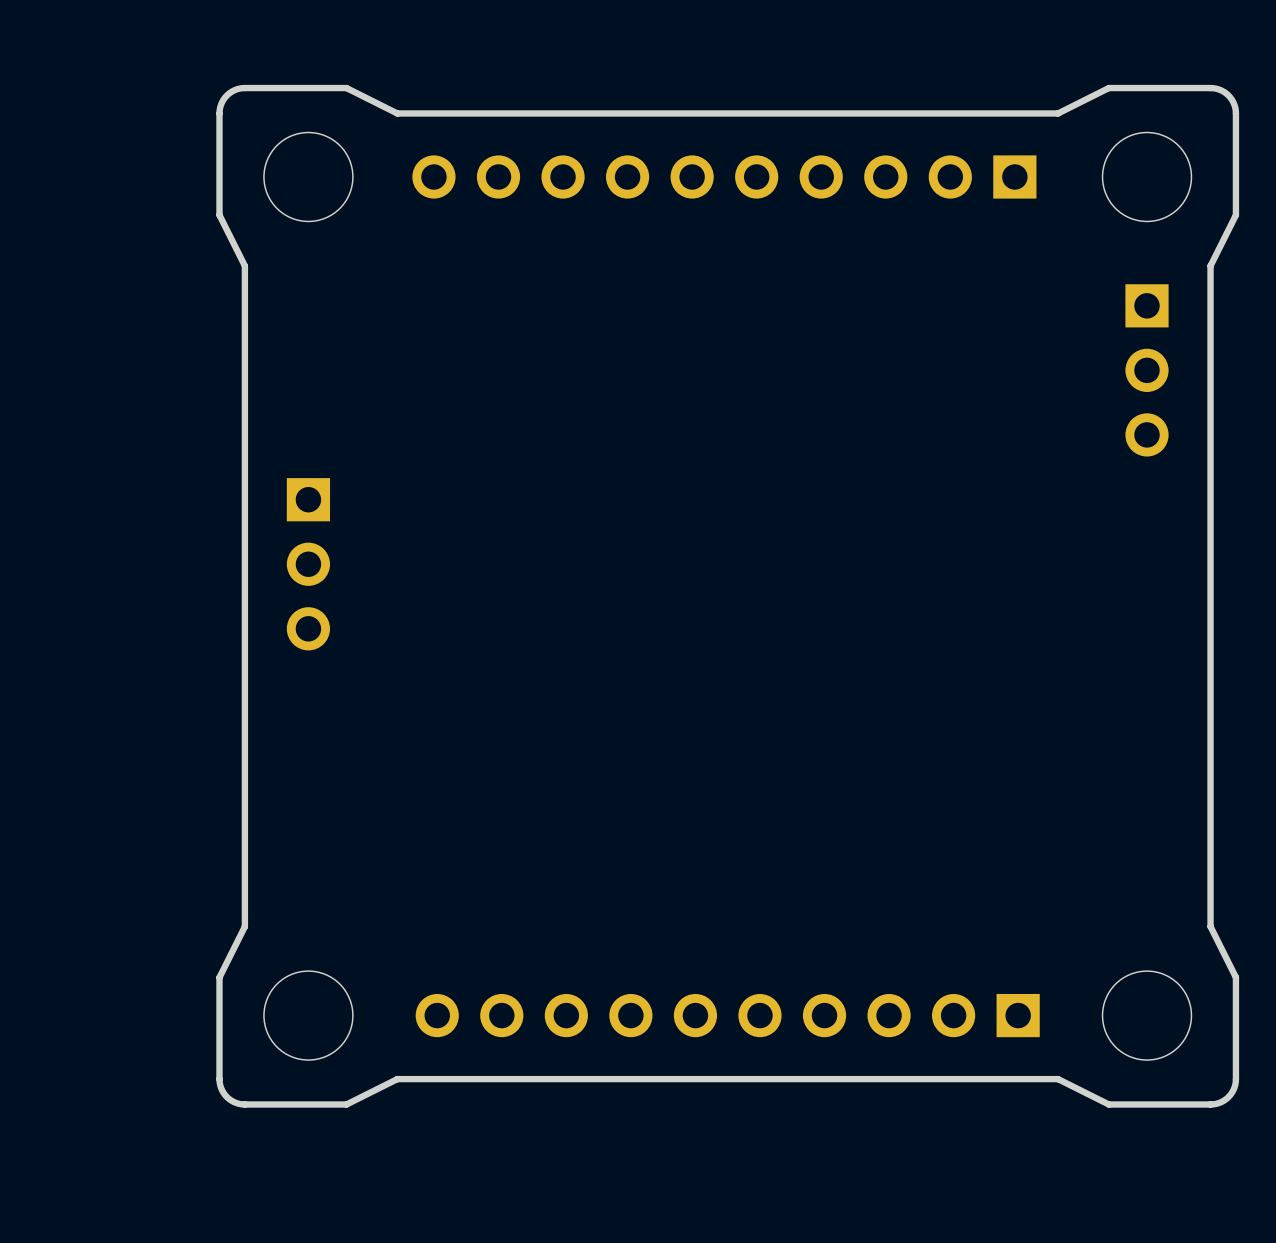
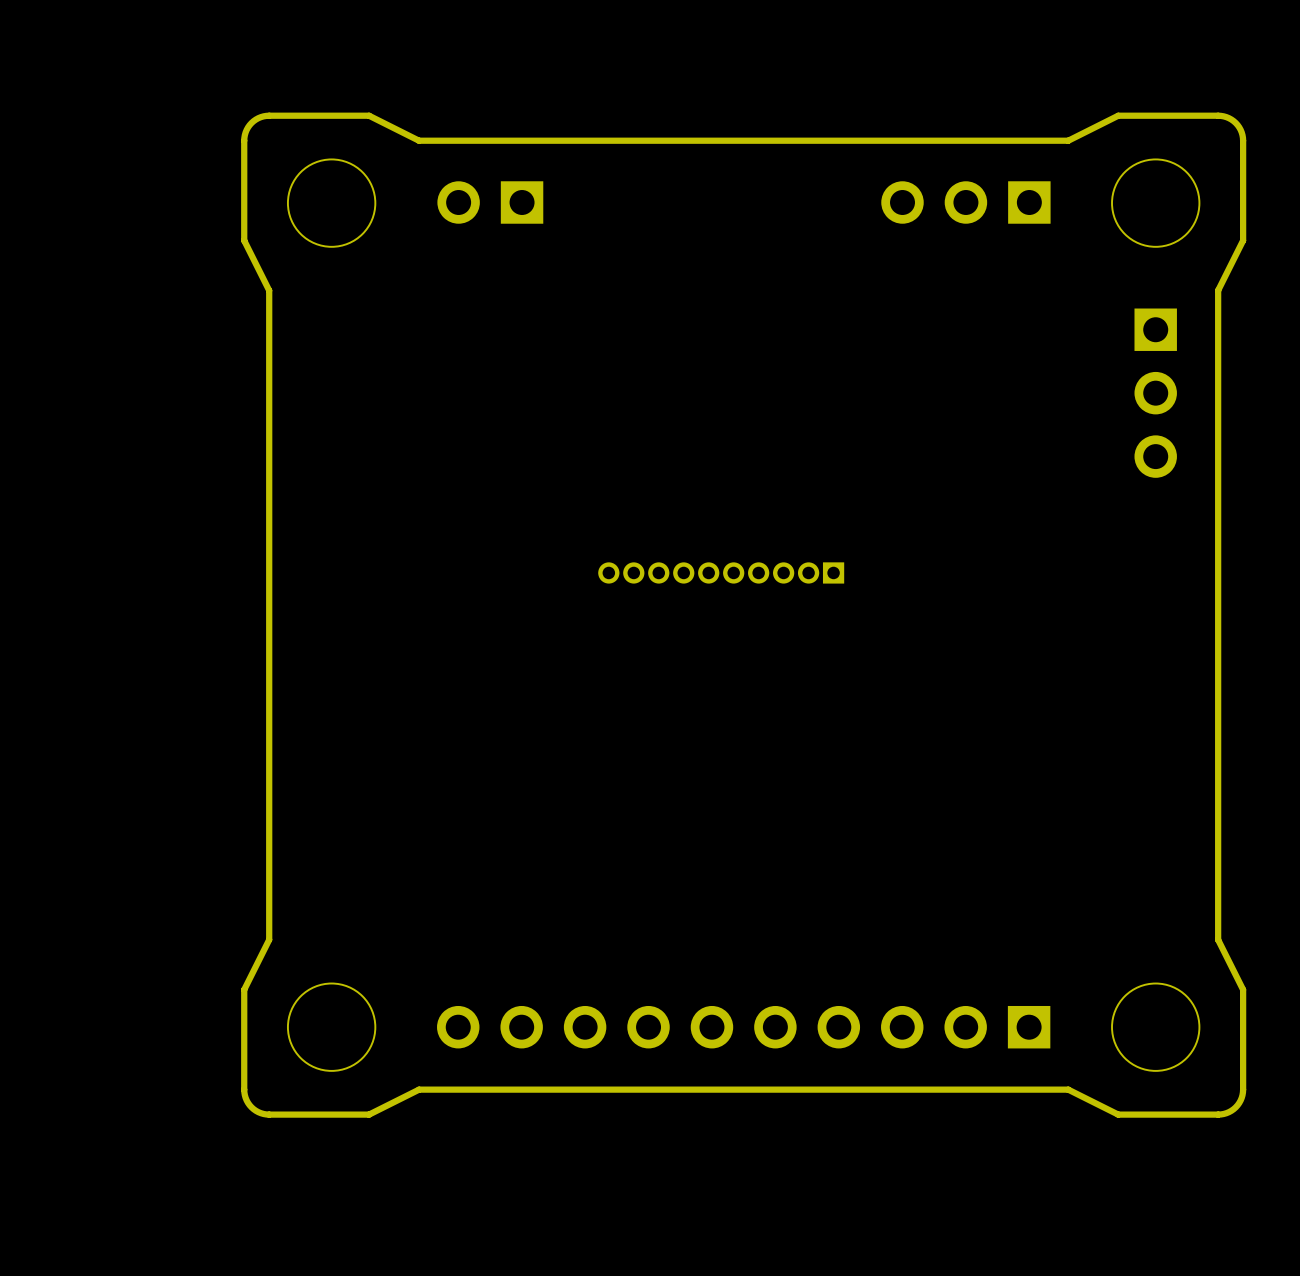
part: none -> (490, 202)
part: (724, 176) -> none
part: none -> (965, 202)
part: none -> (721, 572)
part: (308, 564) -> none

